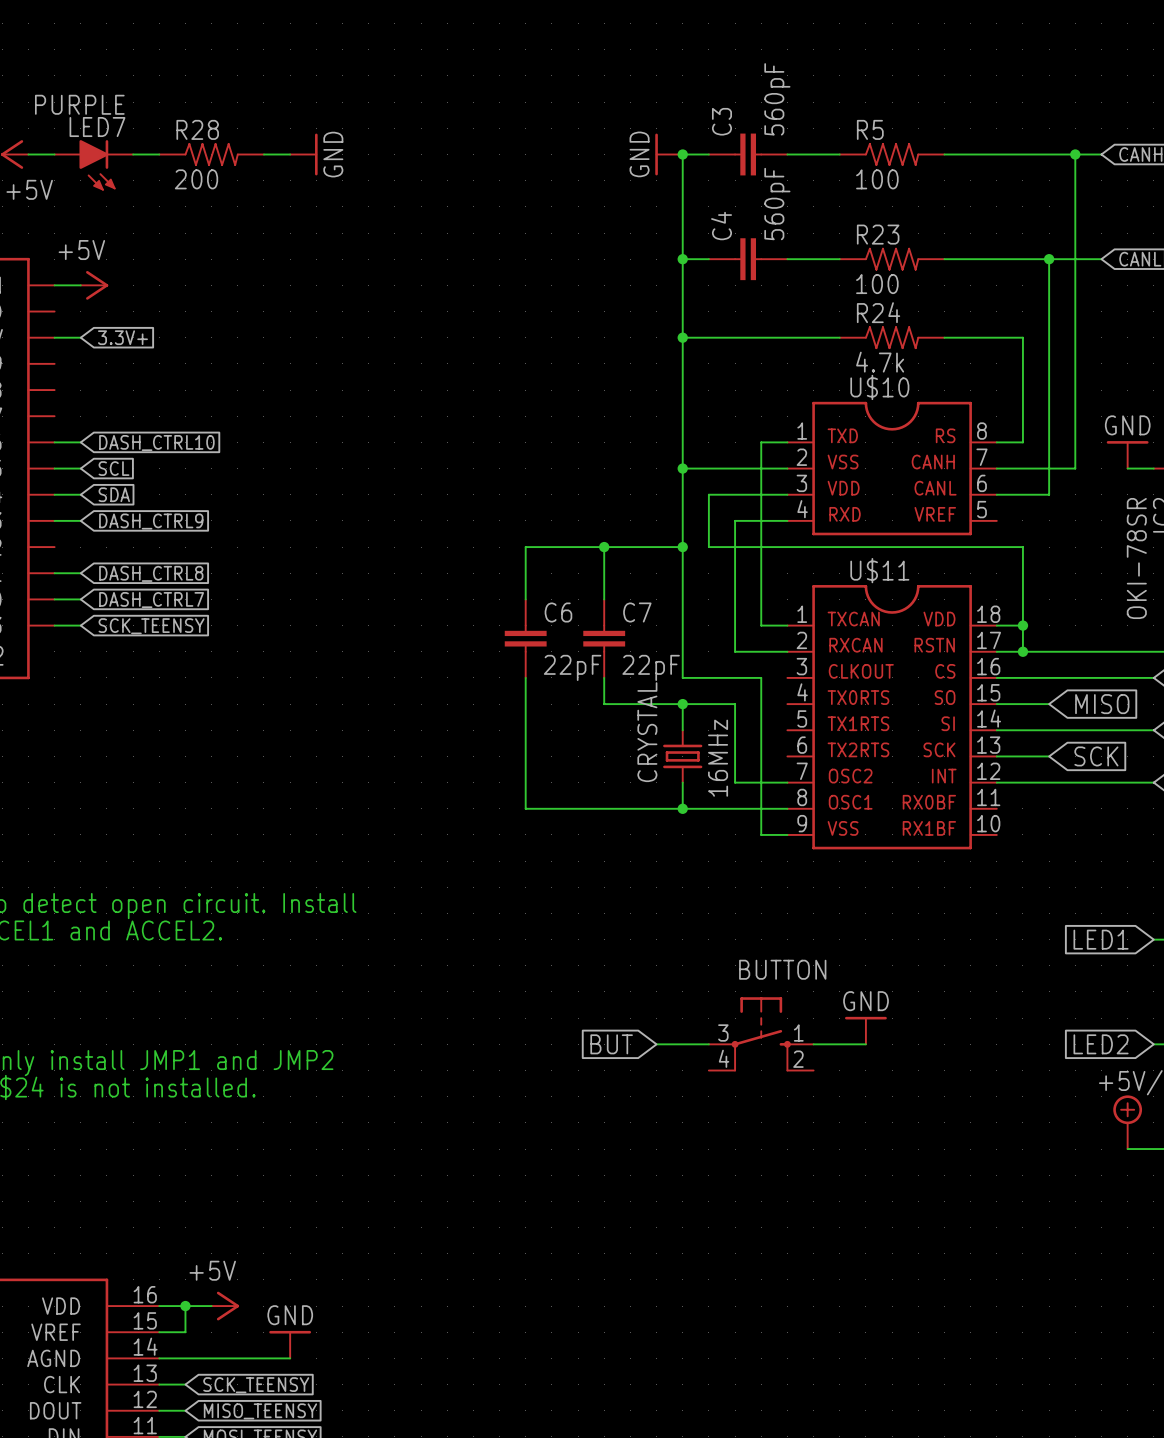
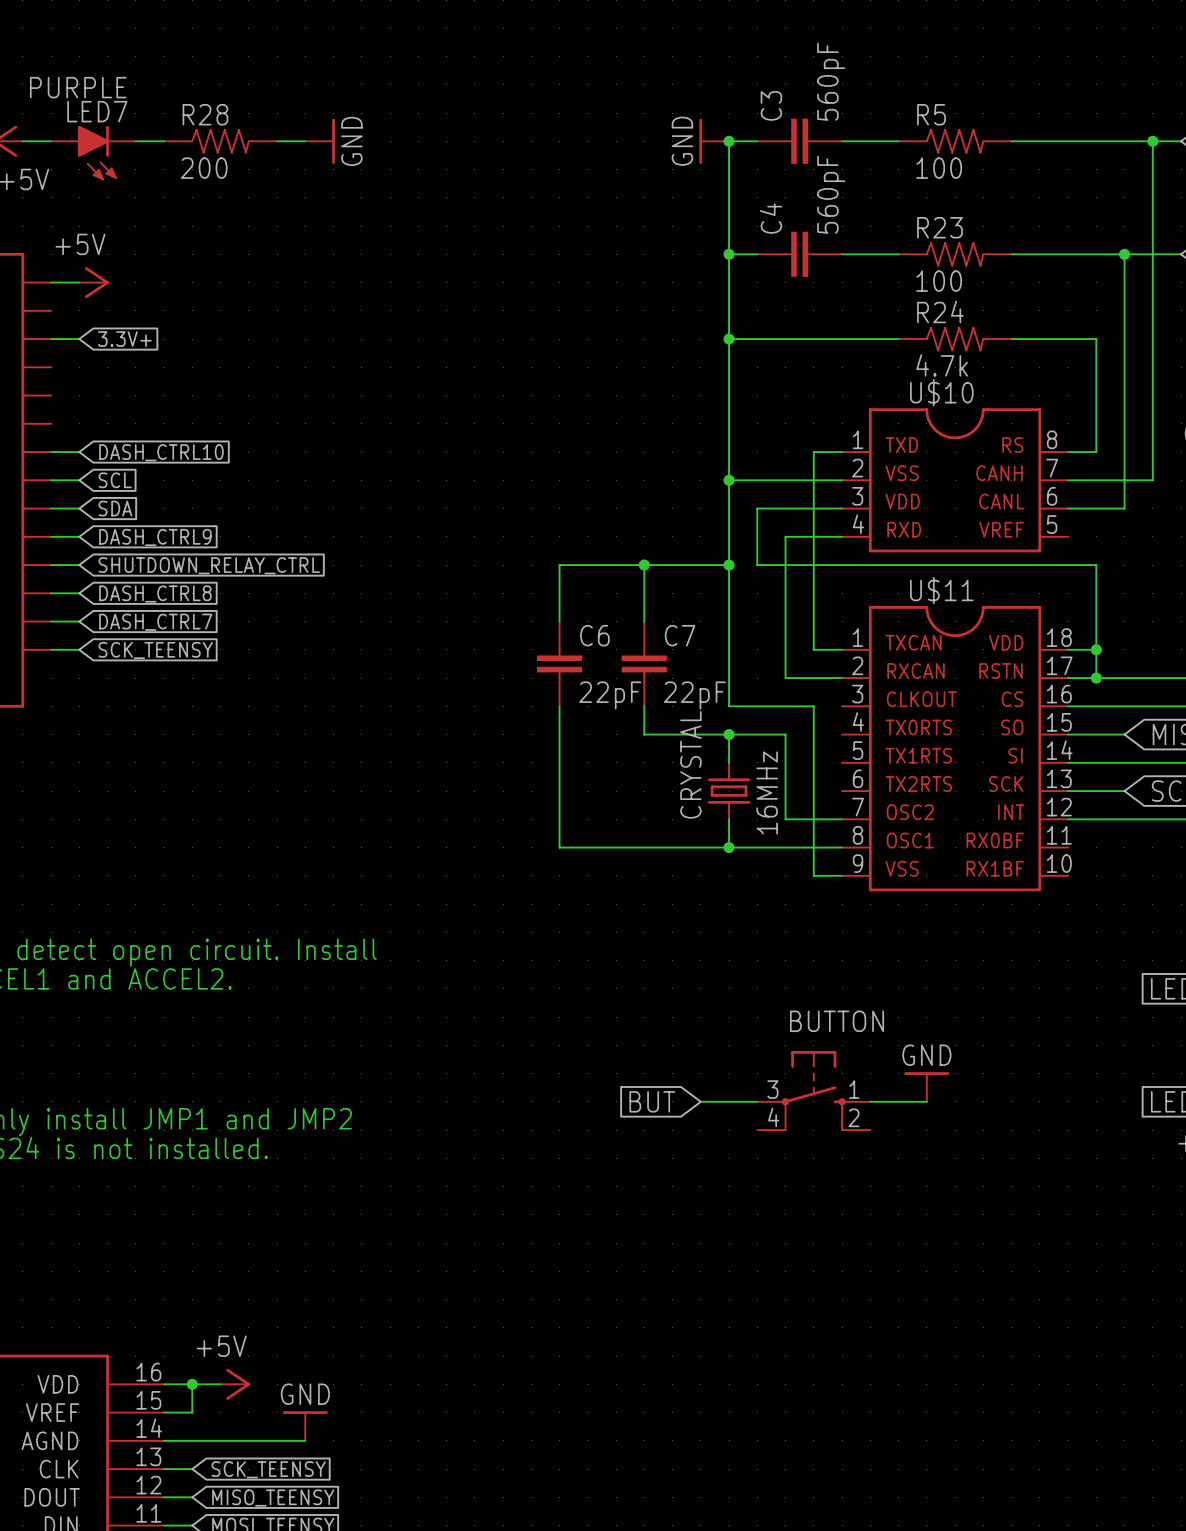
wire: none -> (51, 565) (79, 565)
global label: none -> SHUTDOWN_RELAY_CTRL (209, 565)

